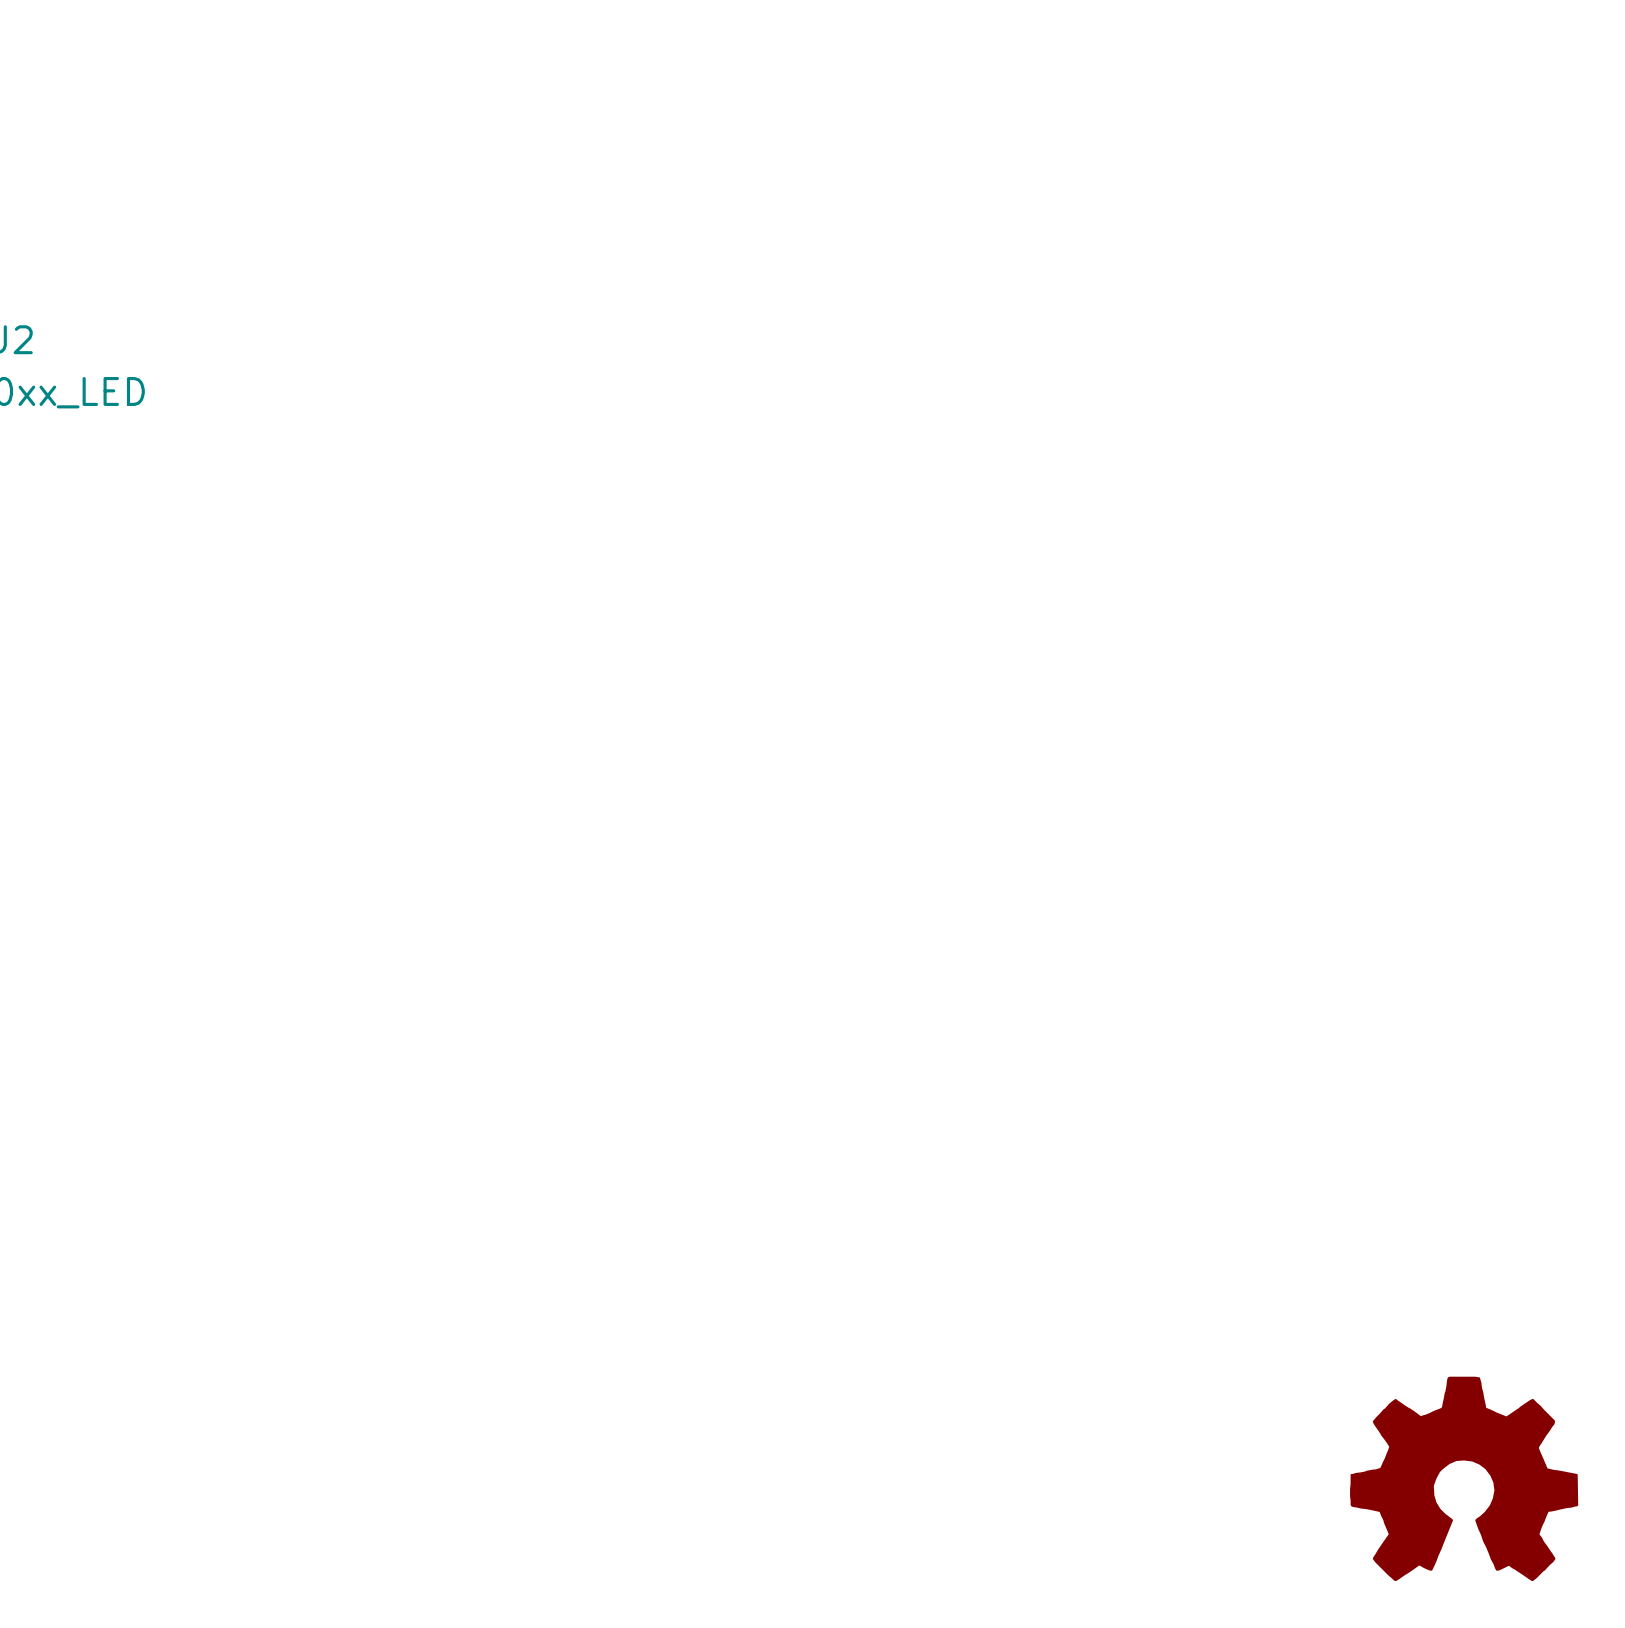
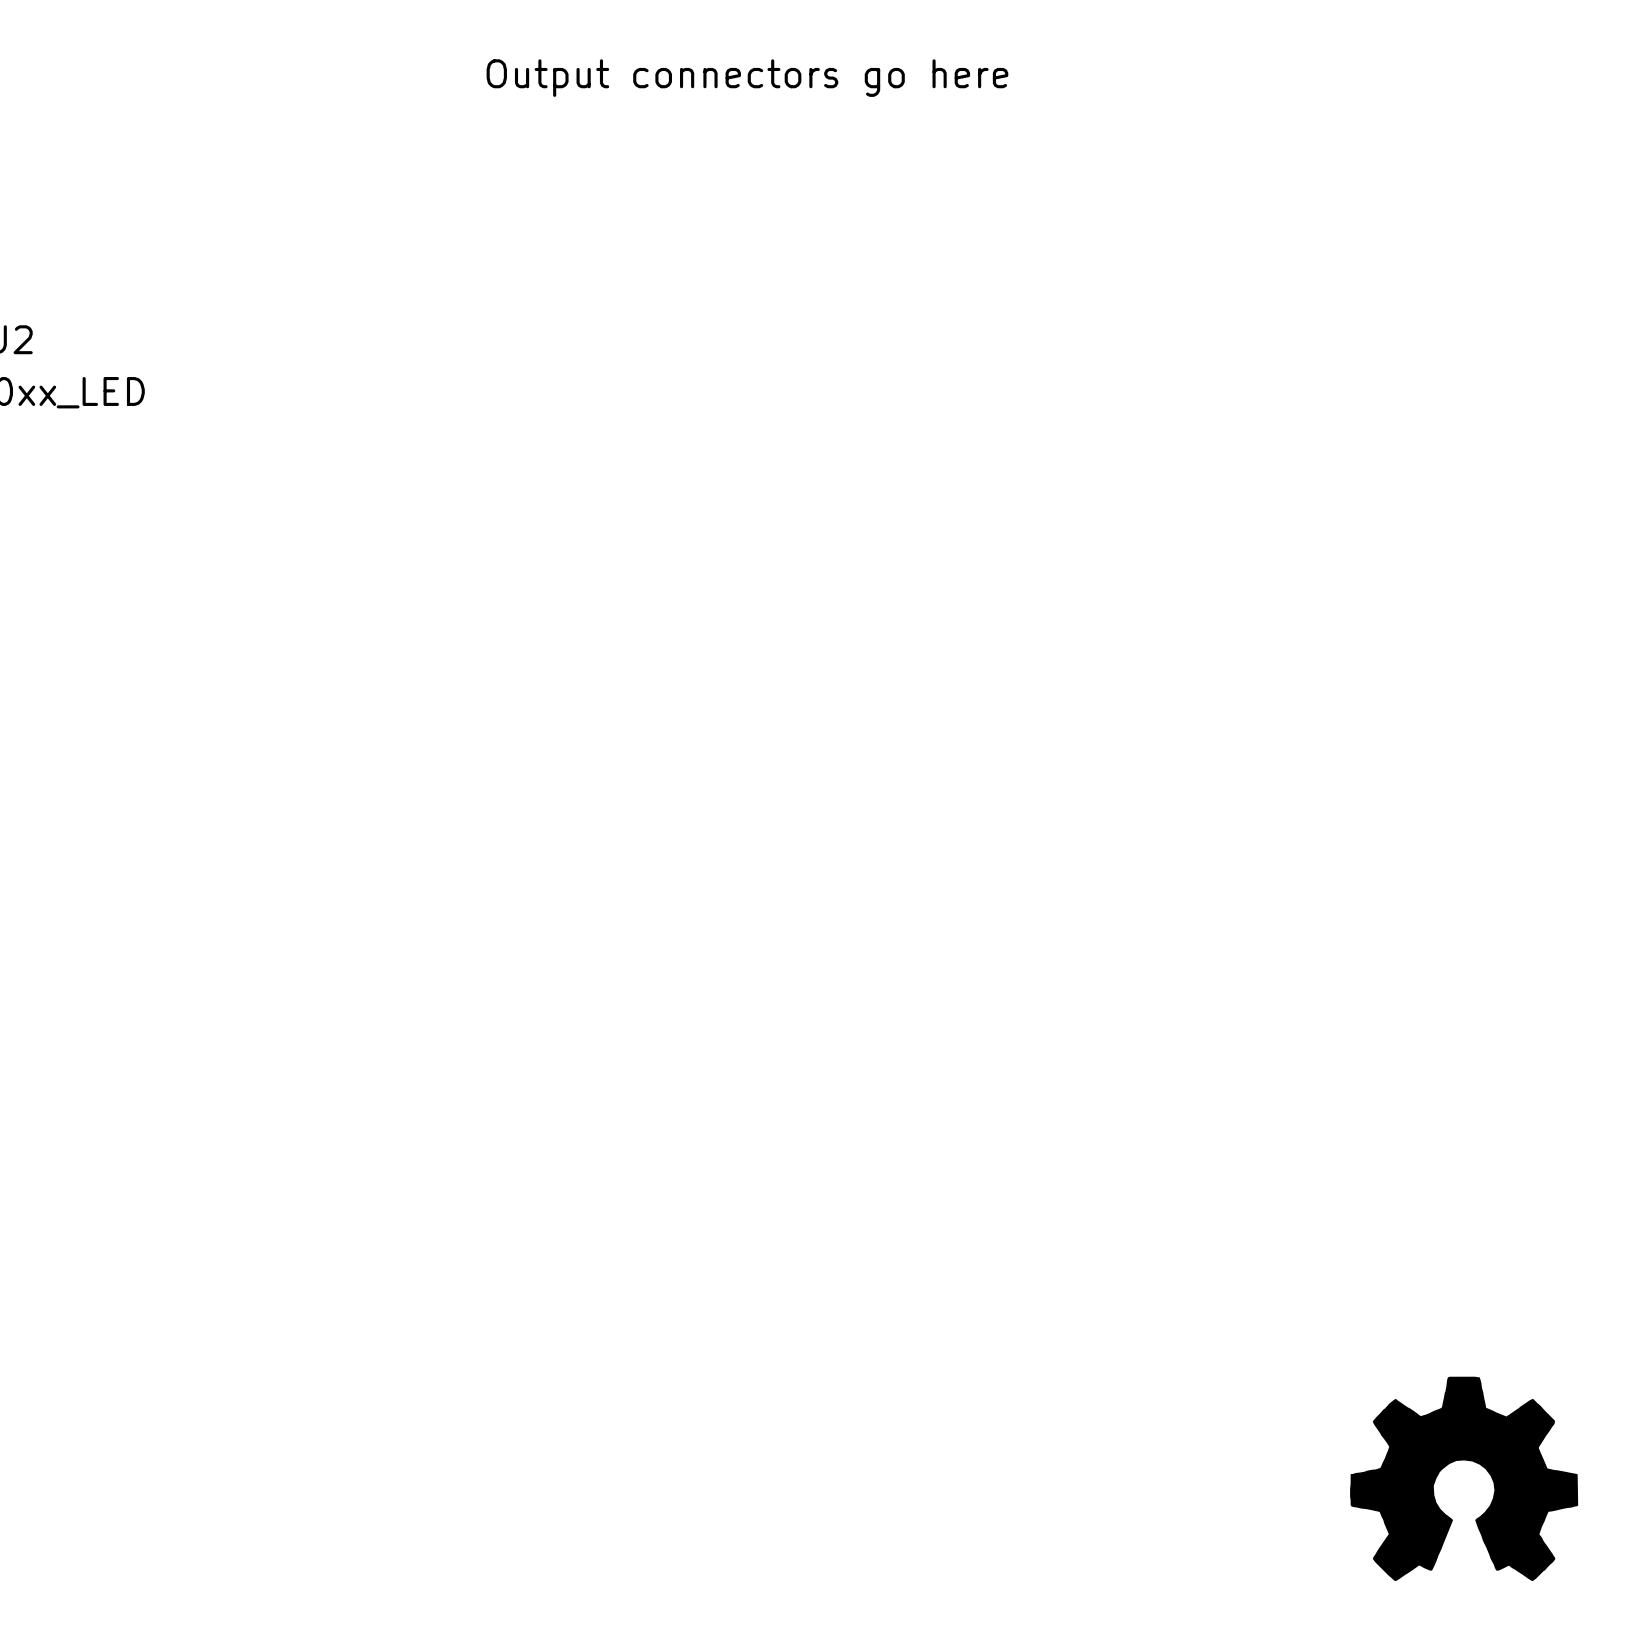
text: none -> Output connectors go here (747, 78)

